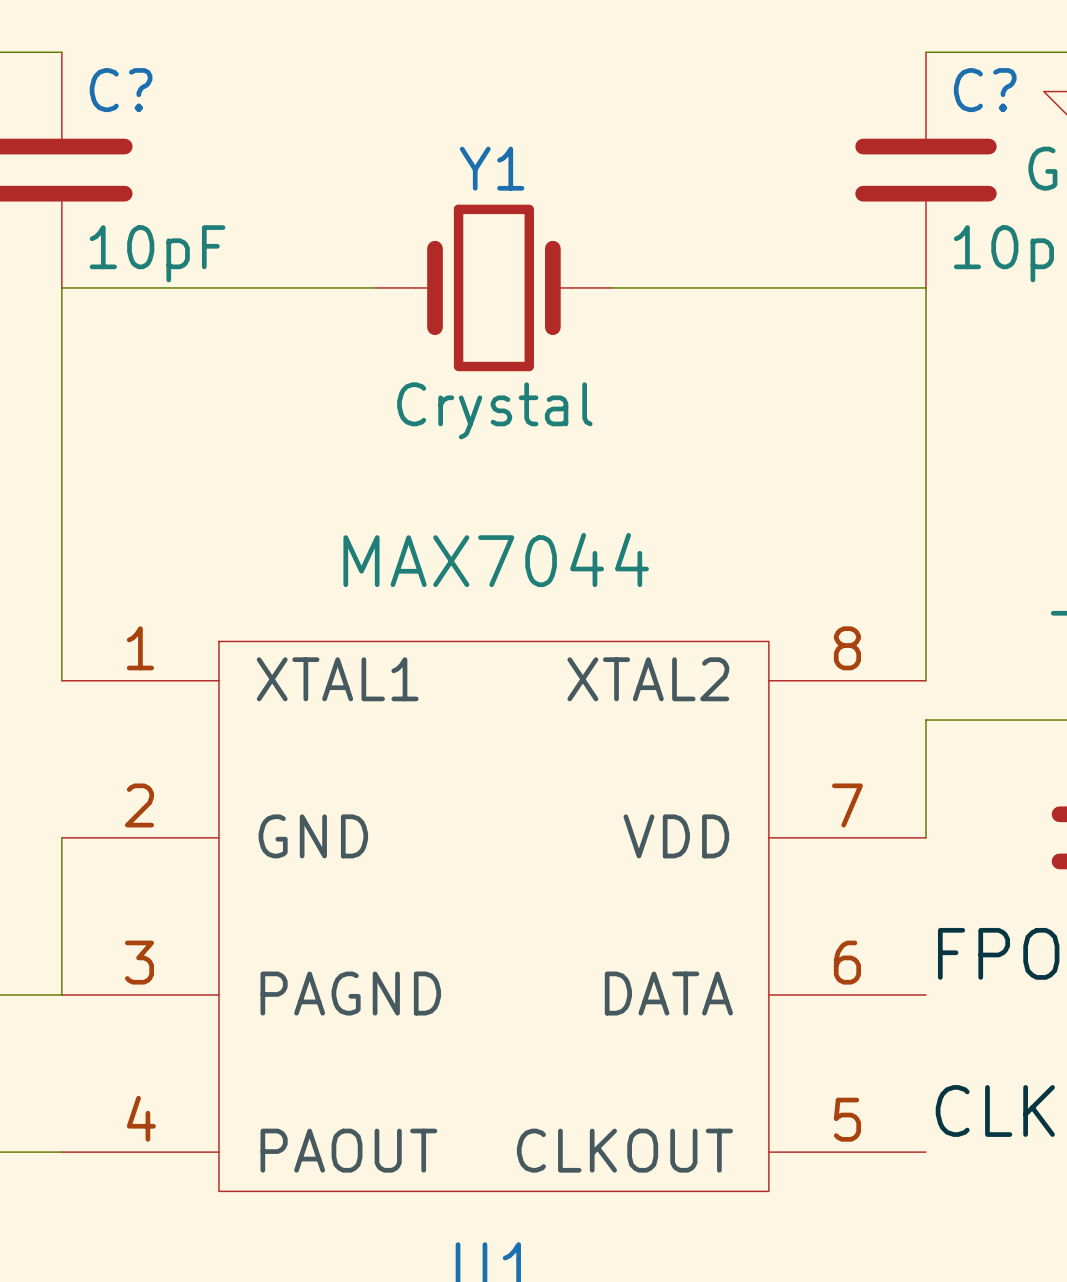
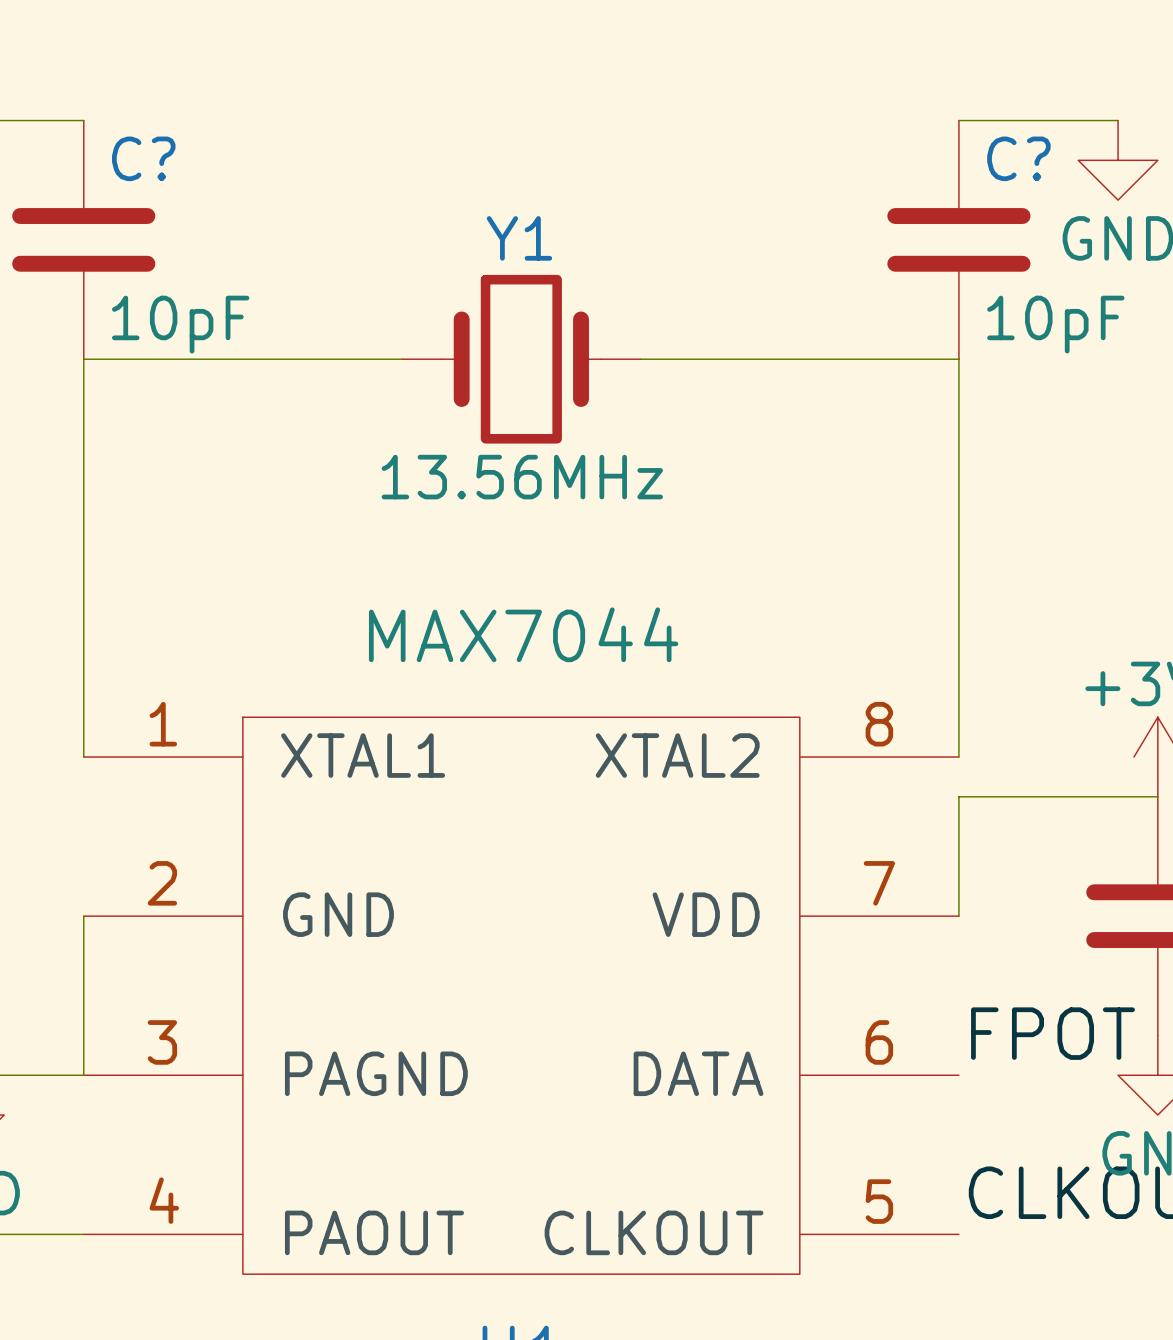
Y1 value: Crystal (494, 410) -> 13.56MHz (522, 477)

